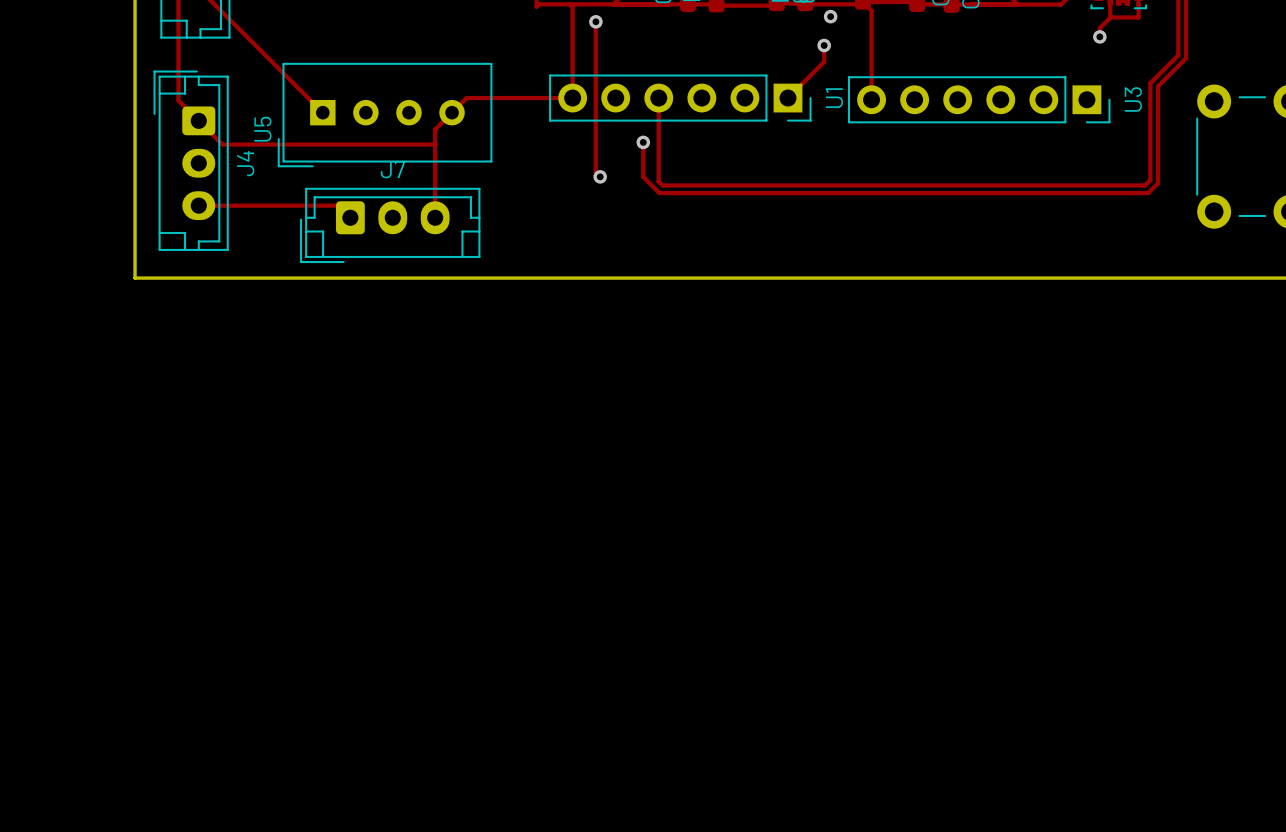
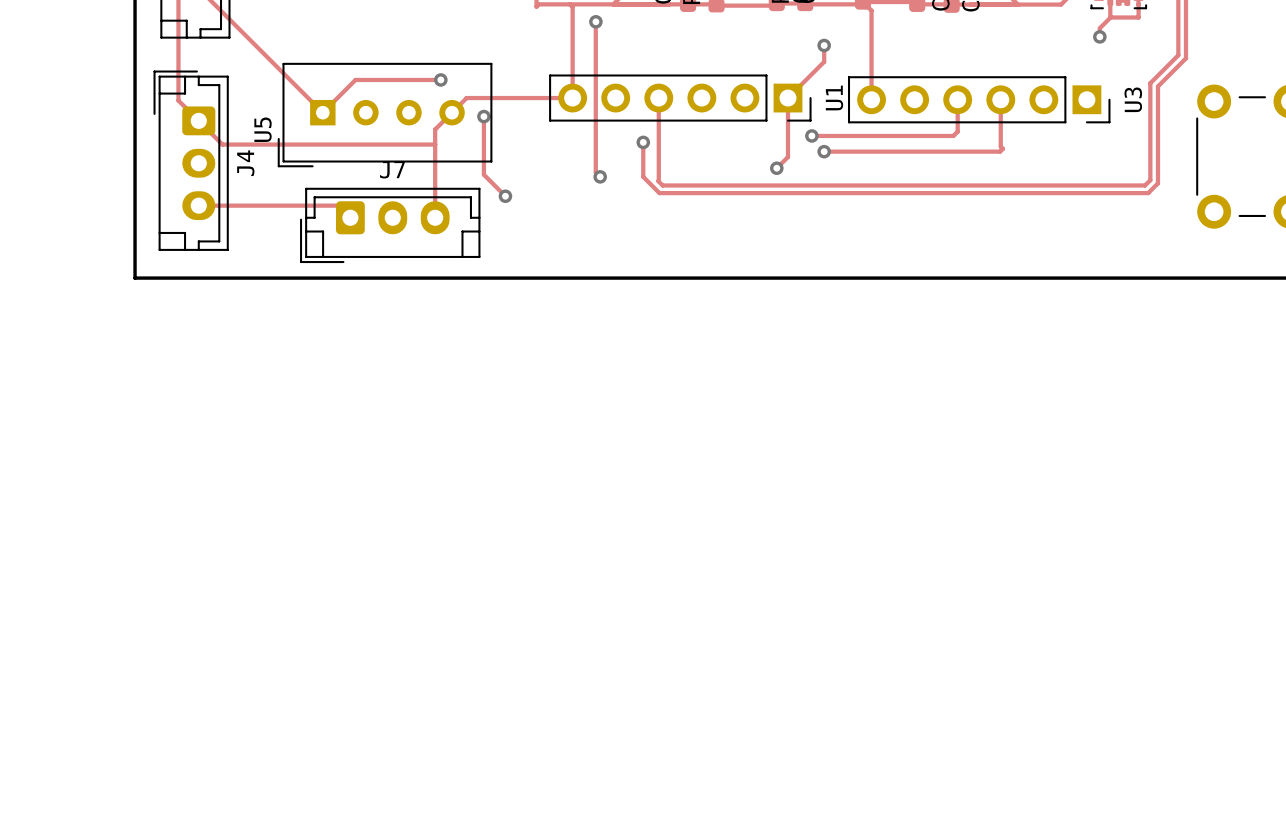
via: (830, 16) -> none
track: none -> (440, 79) (355, 79) (322, 112)
via: none -> (440, 79)
track: none -> (788, 98) (788, 157) (776, 168)
track: none -> (957, 99) (957, 131) (953, 135) (811, 135)
track: none -> (1000, 99) (1000, 146) (1002, 148) (1000, 151) (824, 151)
track: none -> (483, 116) (483, 174) (505, 196)
via: none -> (483, 116)
via: none -> (811, 135)
via: none -> (824, 151)
via: none -> (776, 168)
via: none -> (505, 196)

